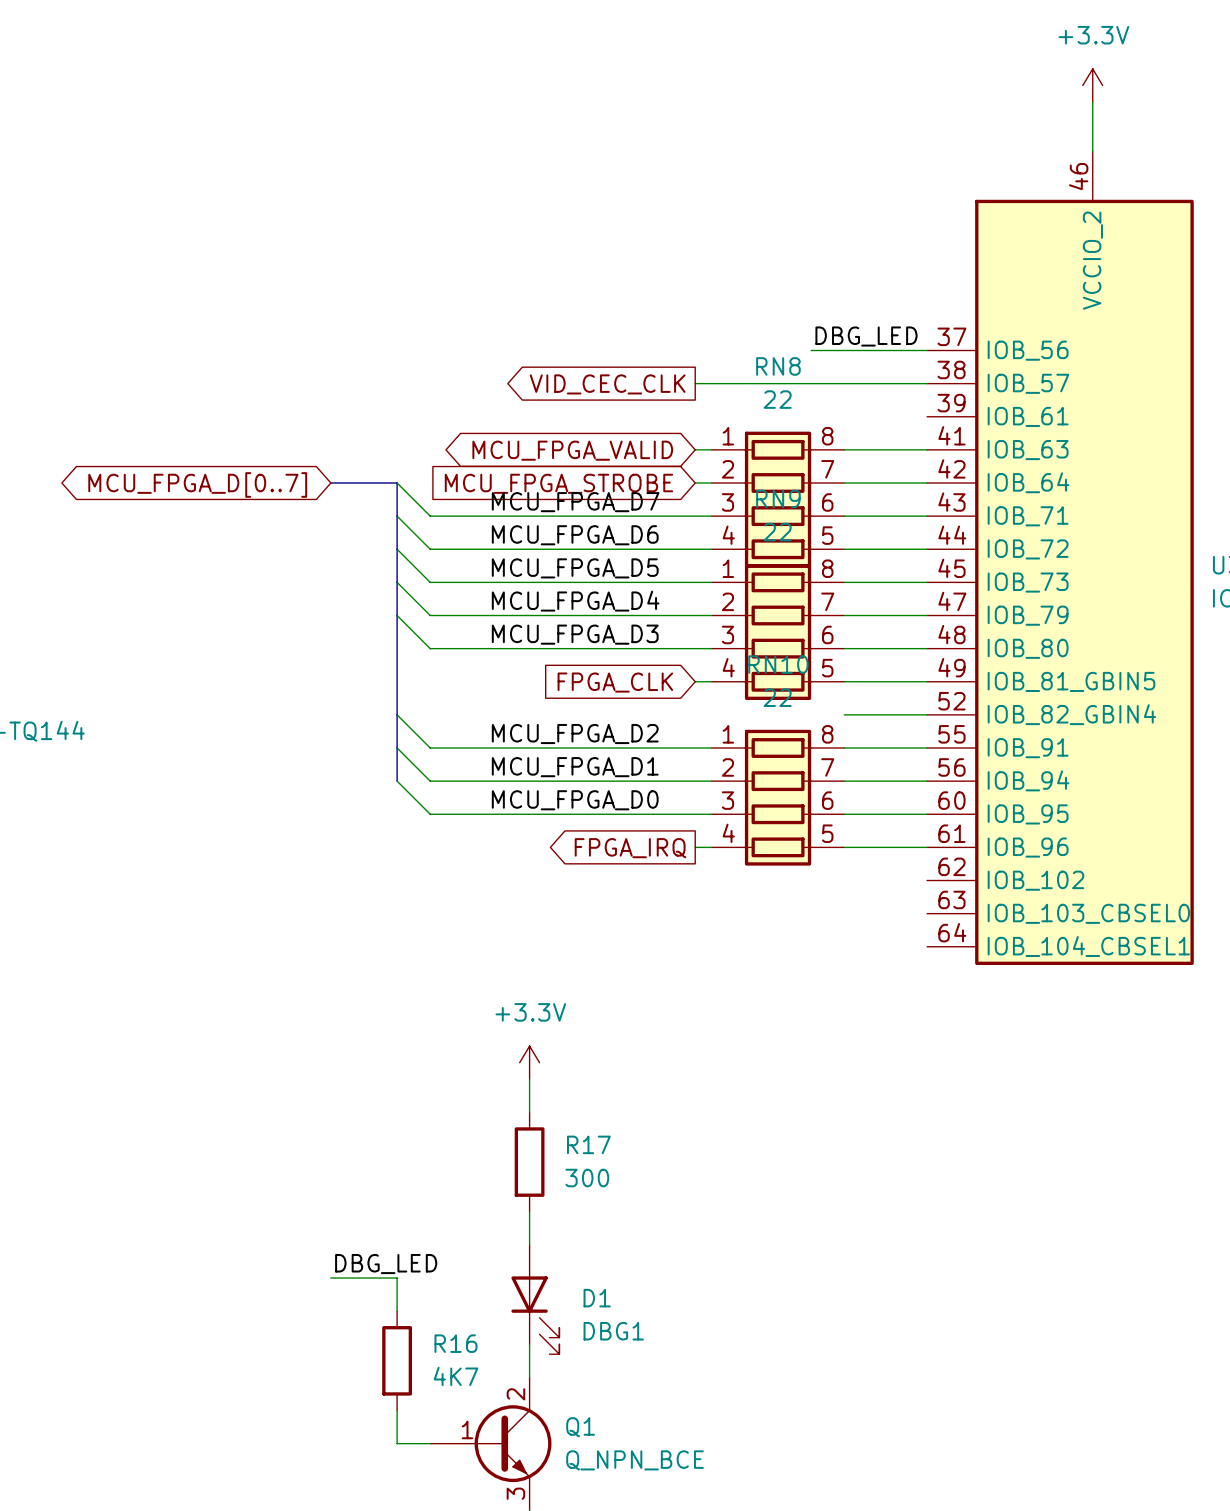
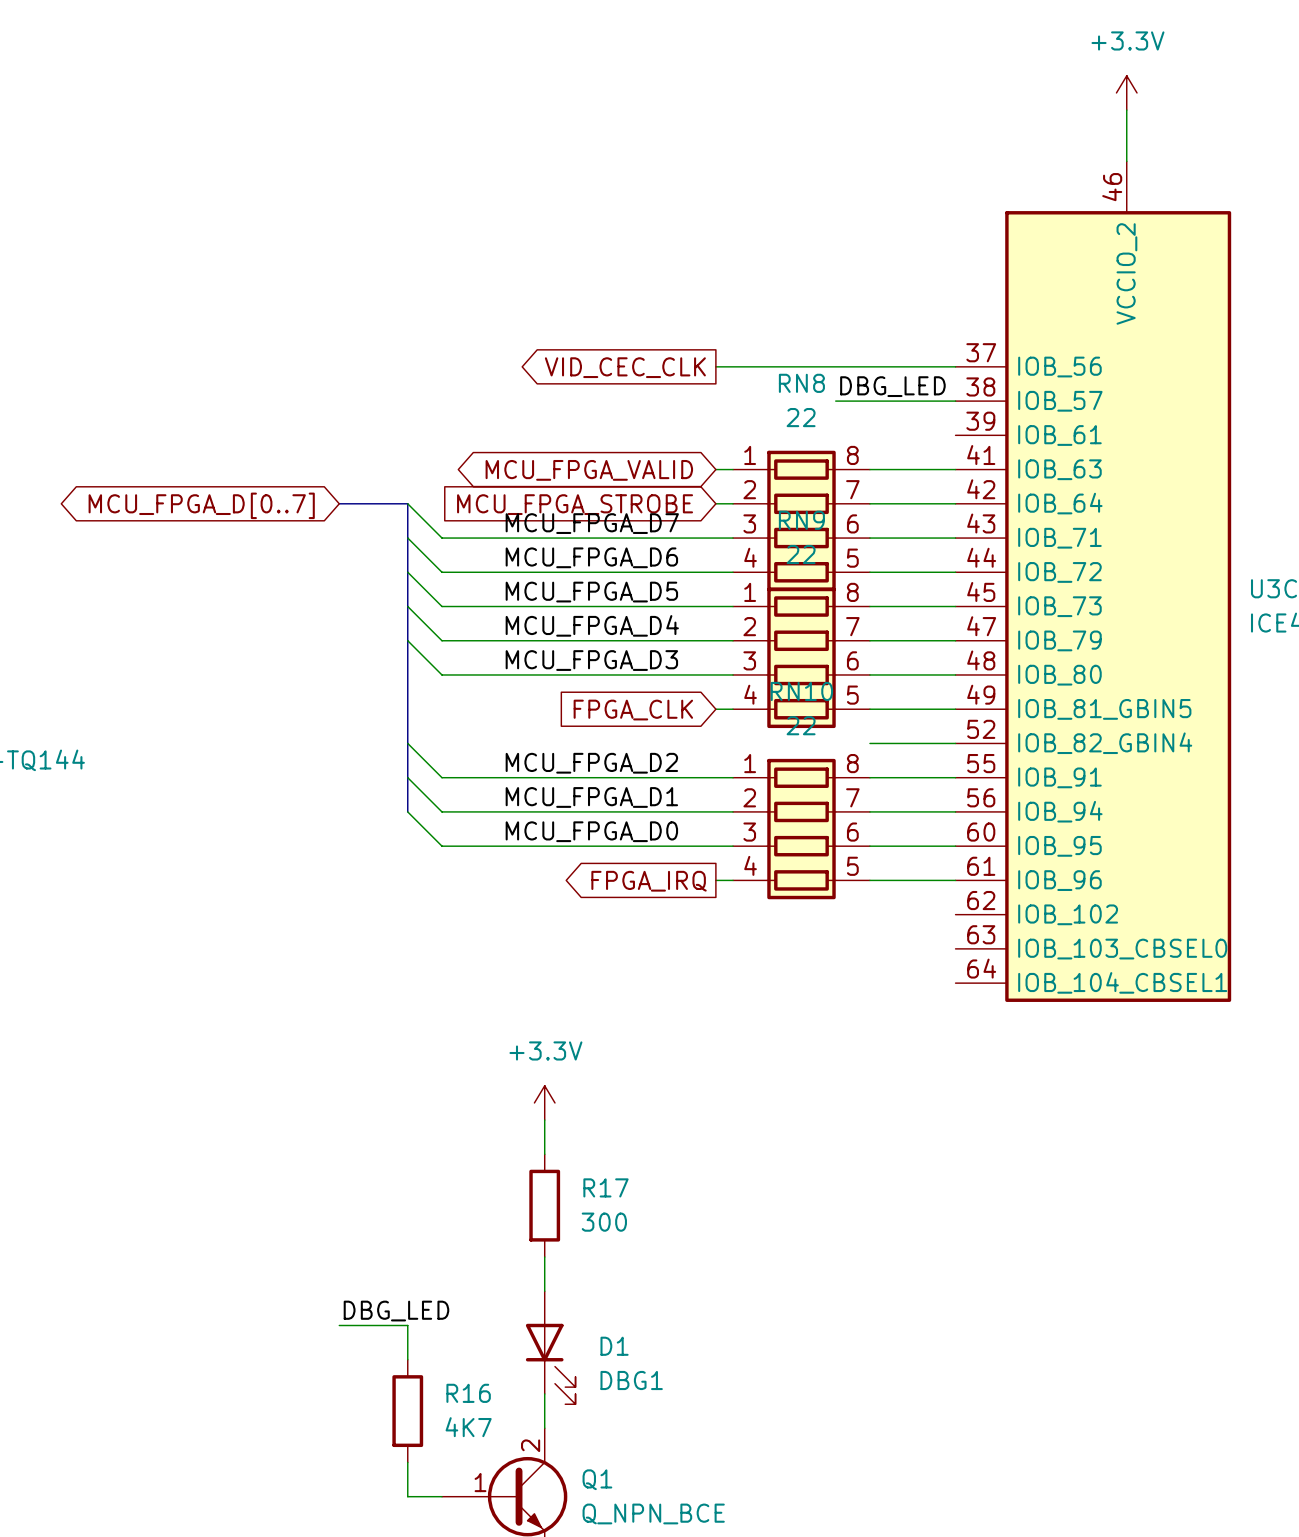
label position: DBG_LED (866, 336) -> DBG_LED (892, 386)
wire: (695, 383) (811, 383) -> (715, 366) (835, 366)
global label position: VID_CEC_CLK (607, 384) -> VID_CEC_CLK (625, 367)

